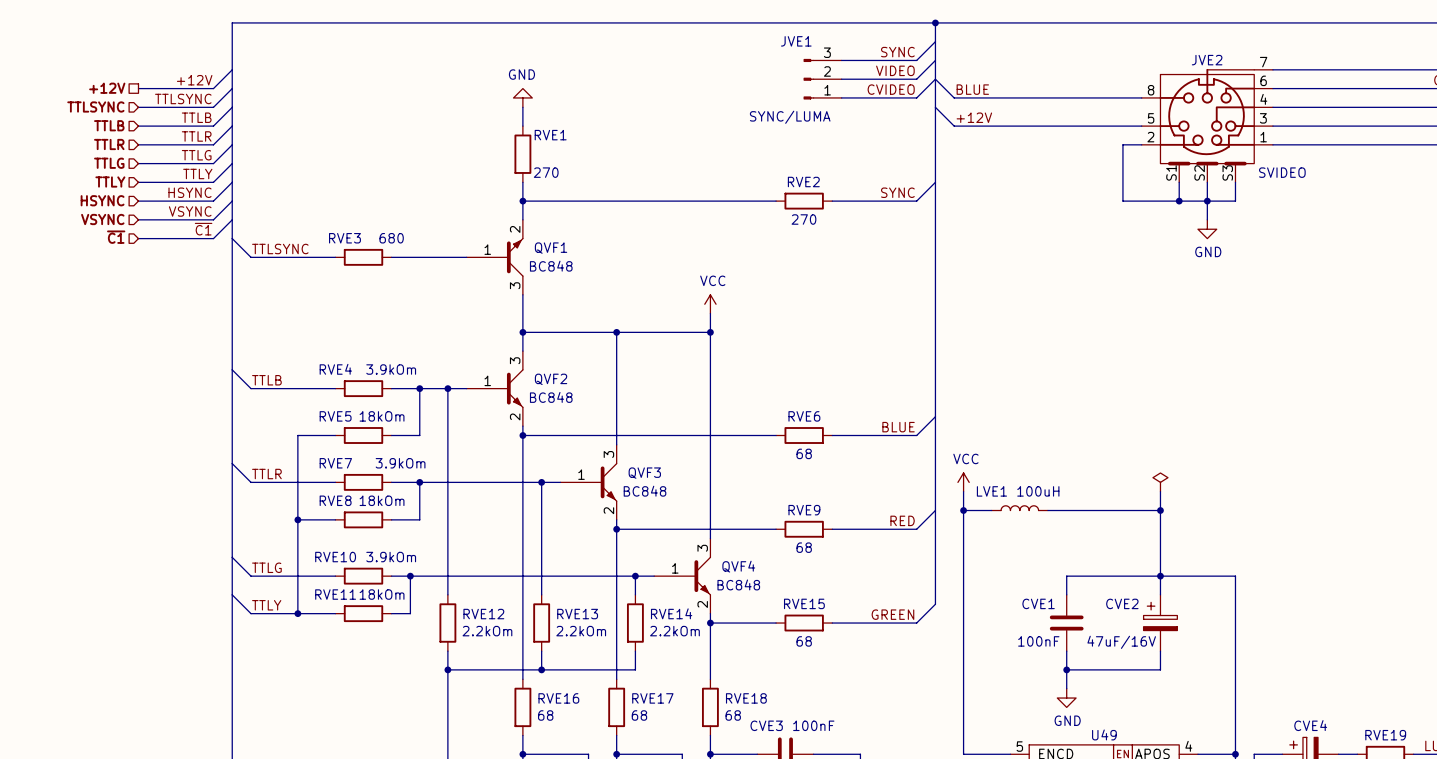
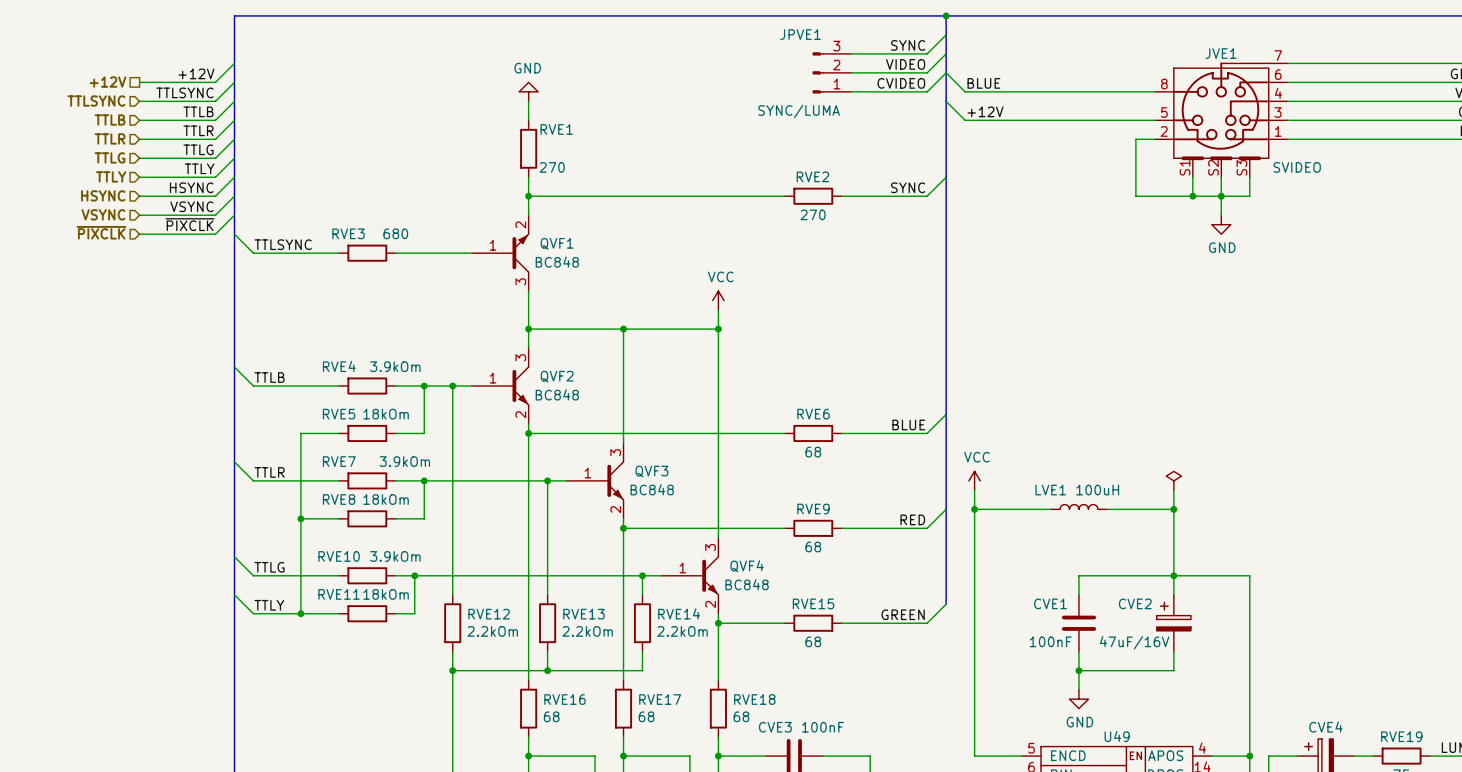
JVE1 name: JVE1 (796, 41) -> JPVE1 (800, 34)
JVE2 name: JVE2 (1207, 60) -> JVE1 (1221, 53)
label: ~{C1} (203, 229) -> ~{PIXCLK} (189, 224)
hierarchical label: ~{C1} (116, 237) -> ~{PIXCLK} (101, 232)
LVE1 position: (1019, 508) -> (1078, 506)
wire: (1047, 510) (1094, 510) -> (1003, 509) (1050, 509)

